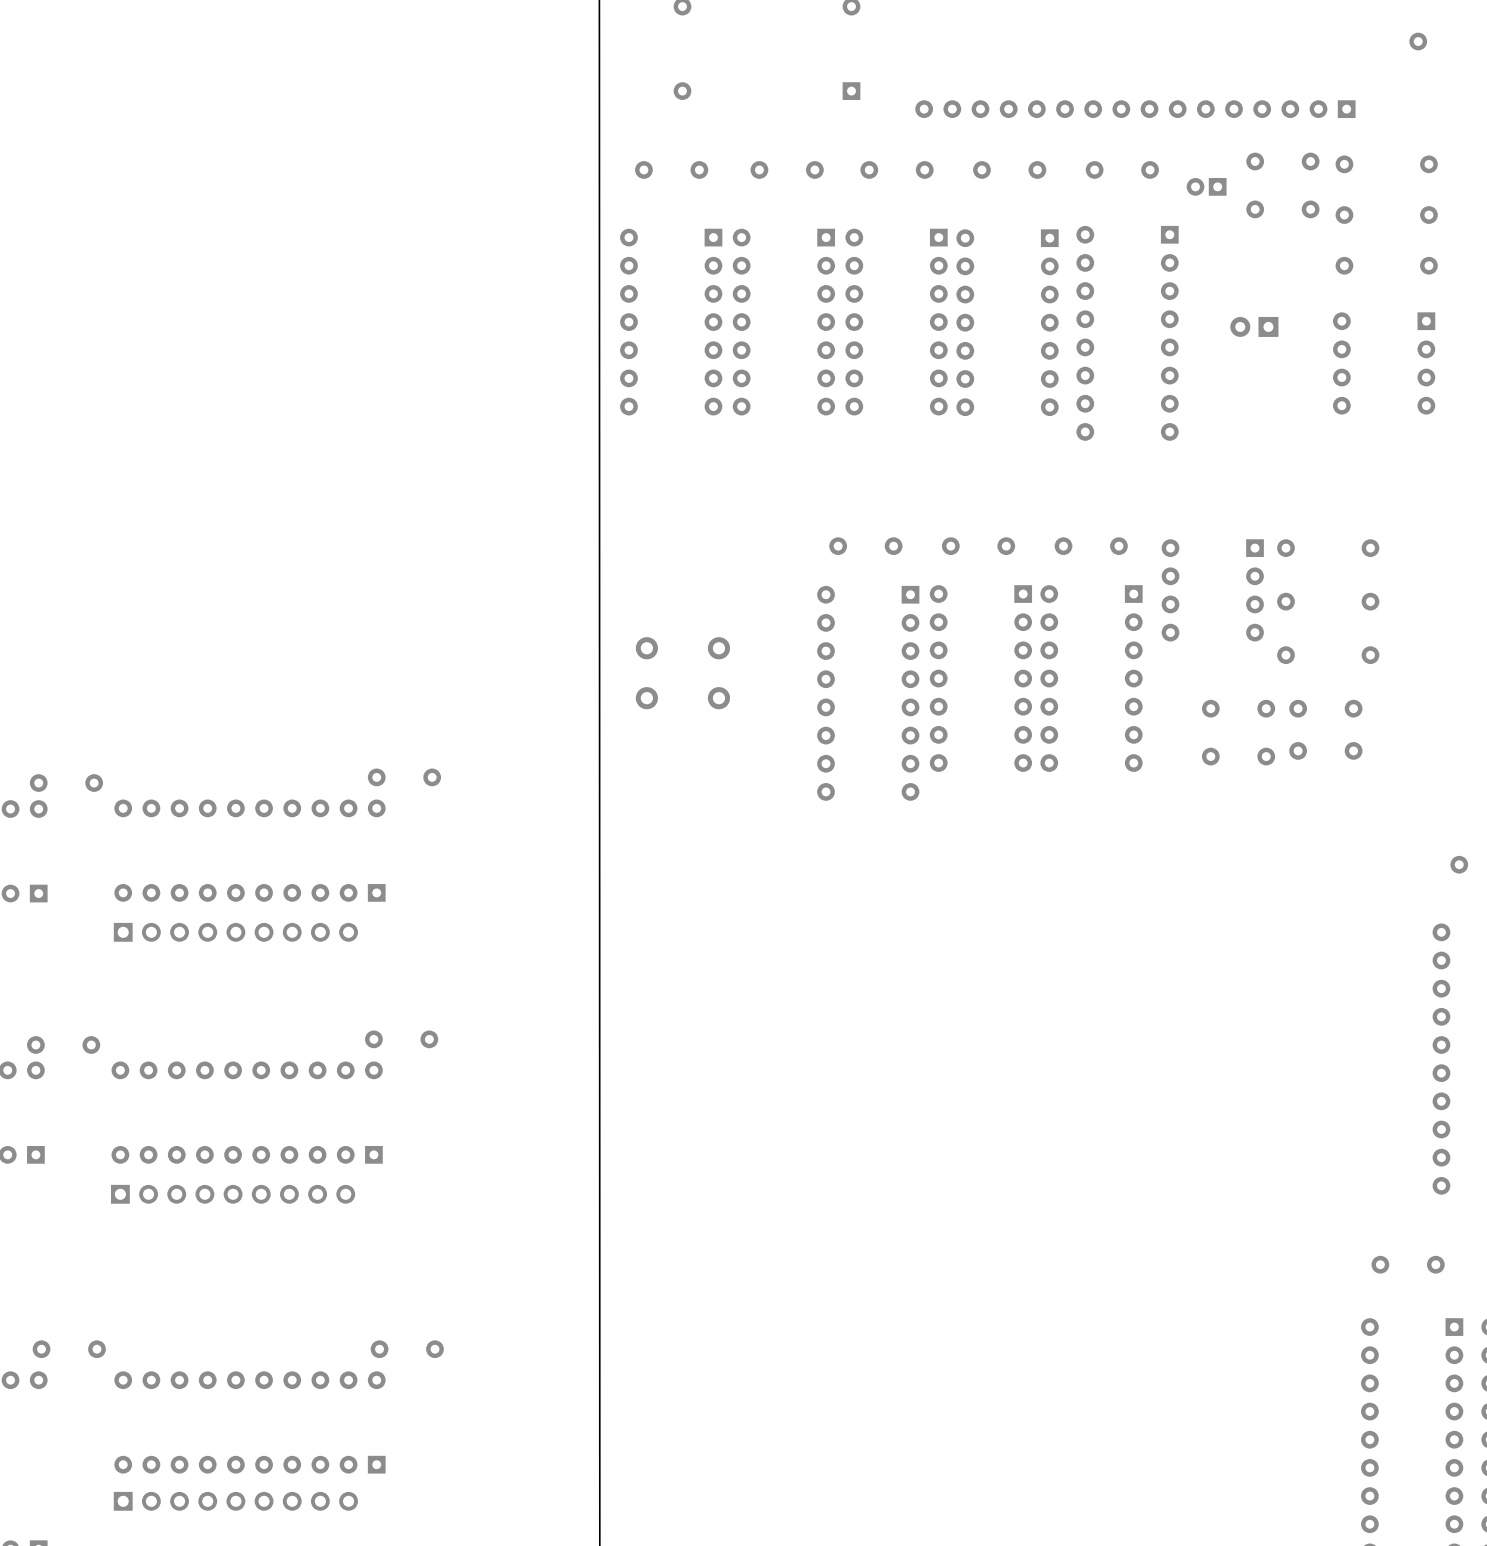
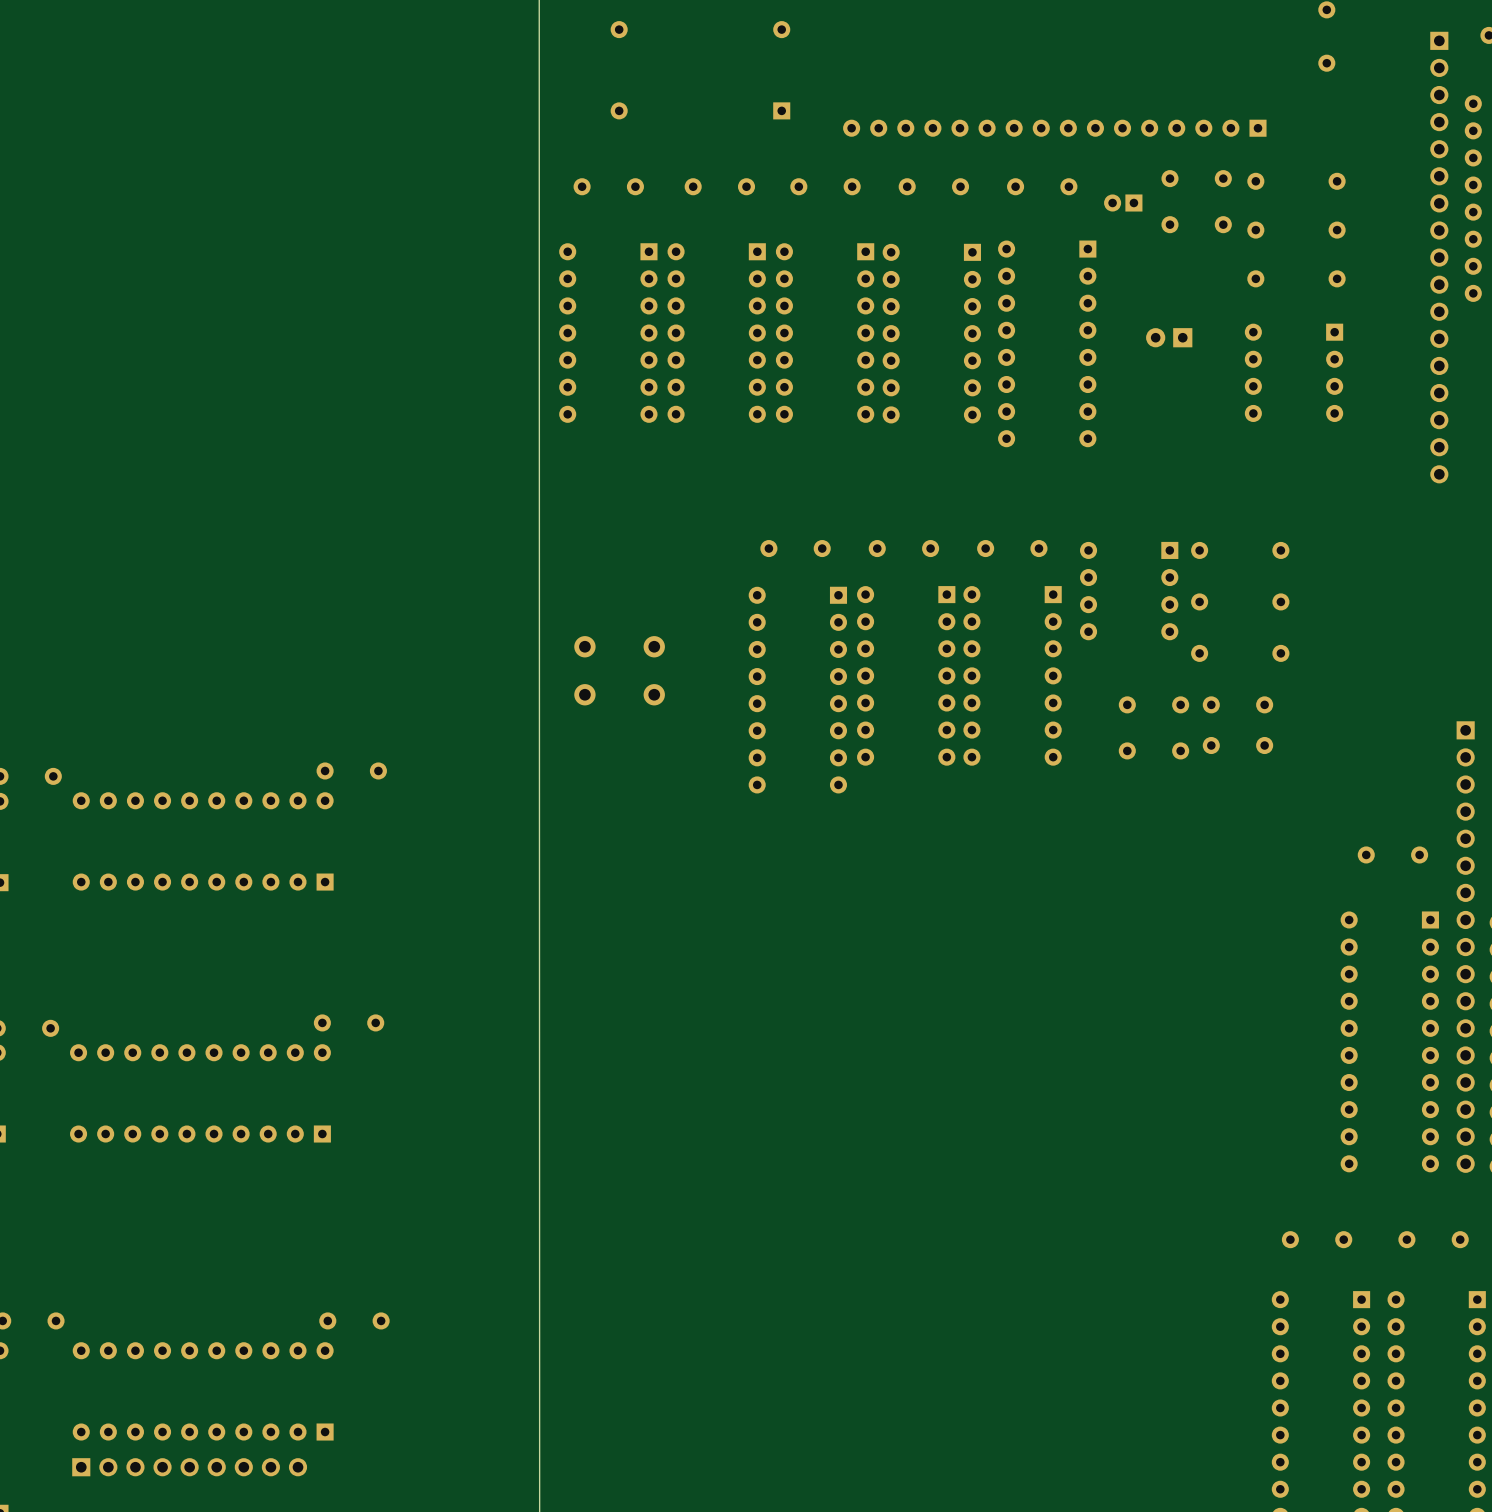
part: (235, 932) -> none
part: (233, 1194) -> none

